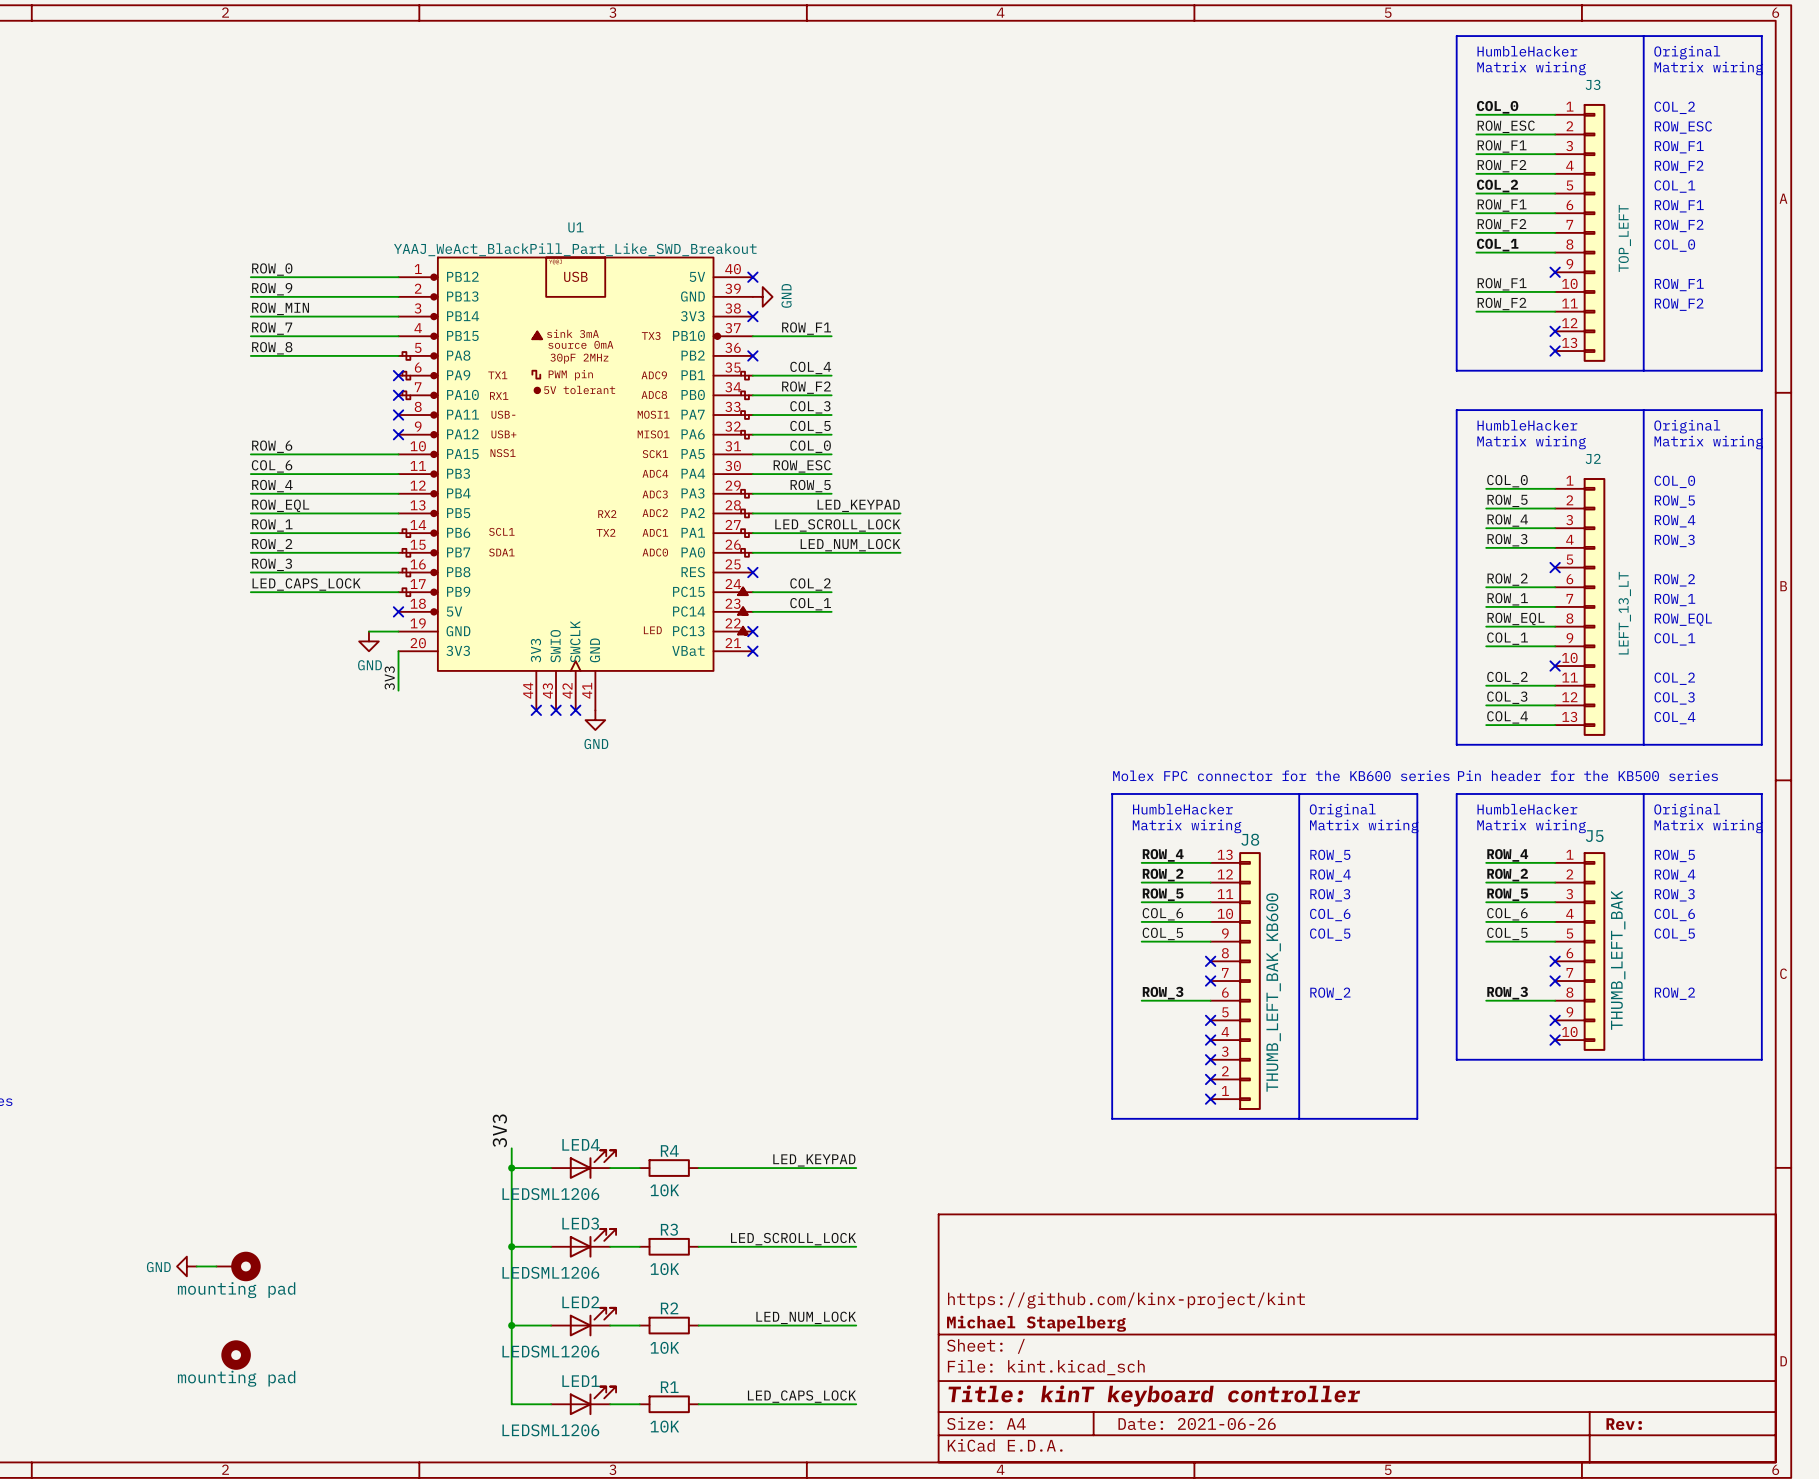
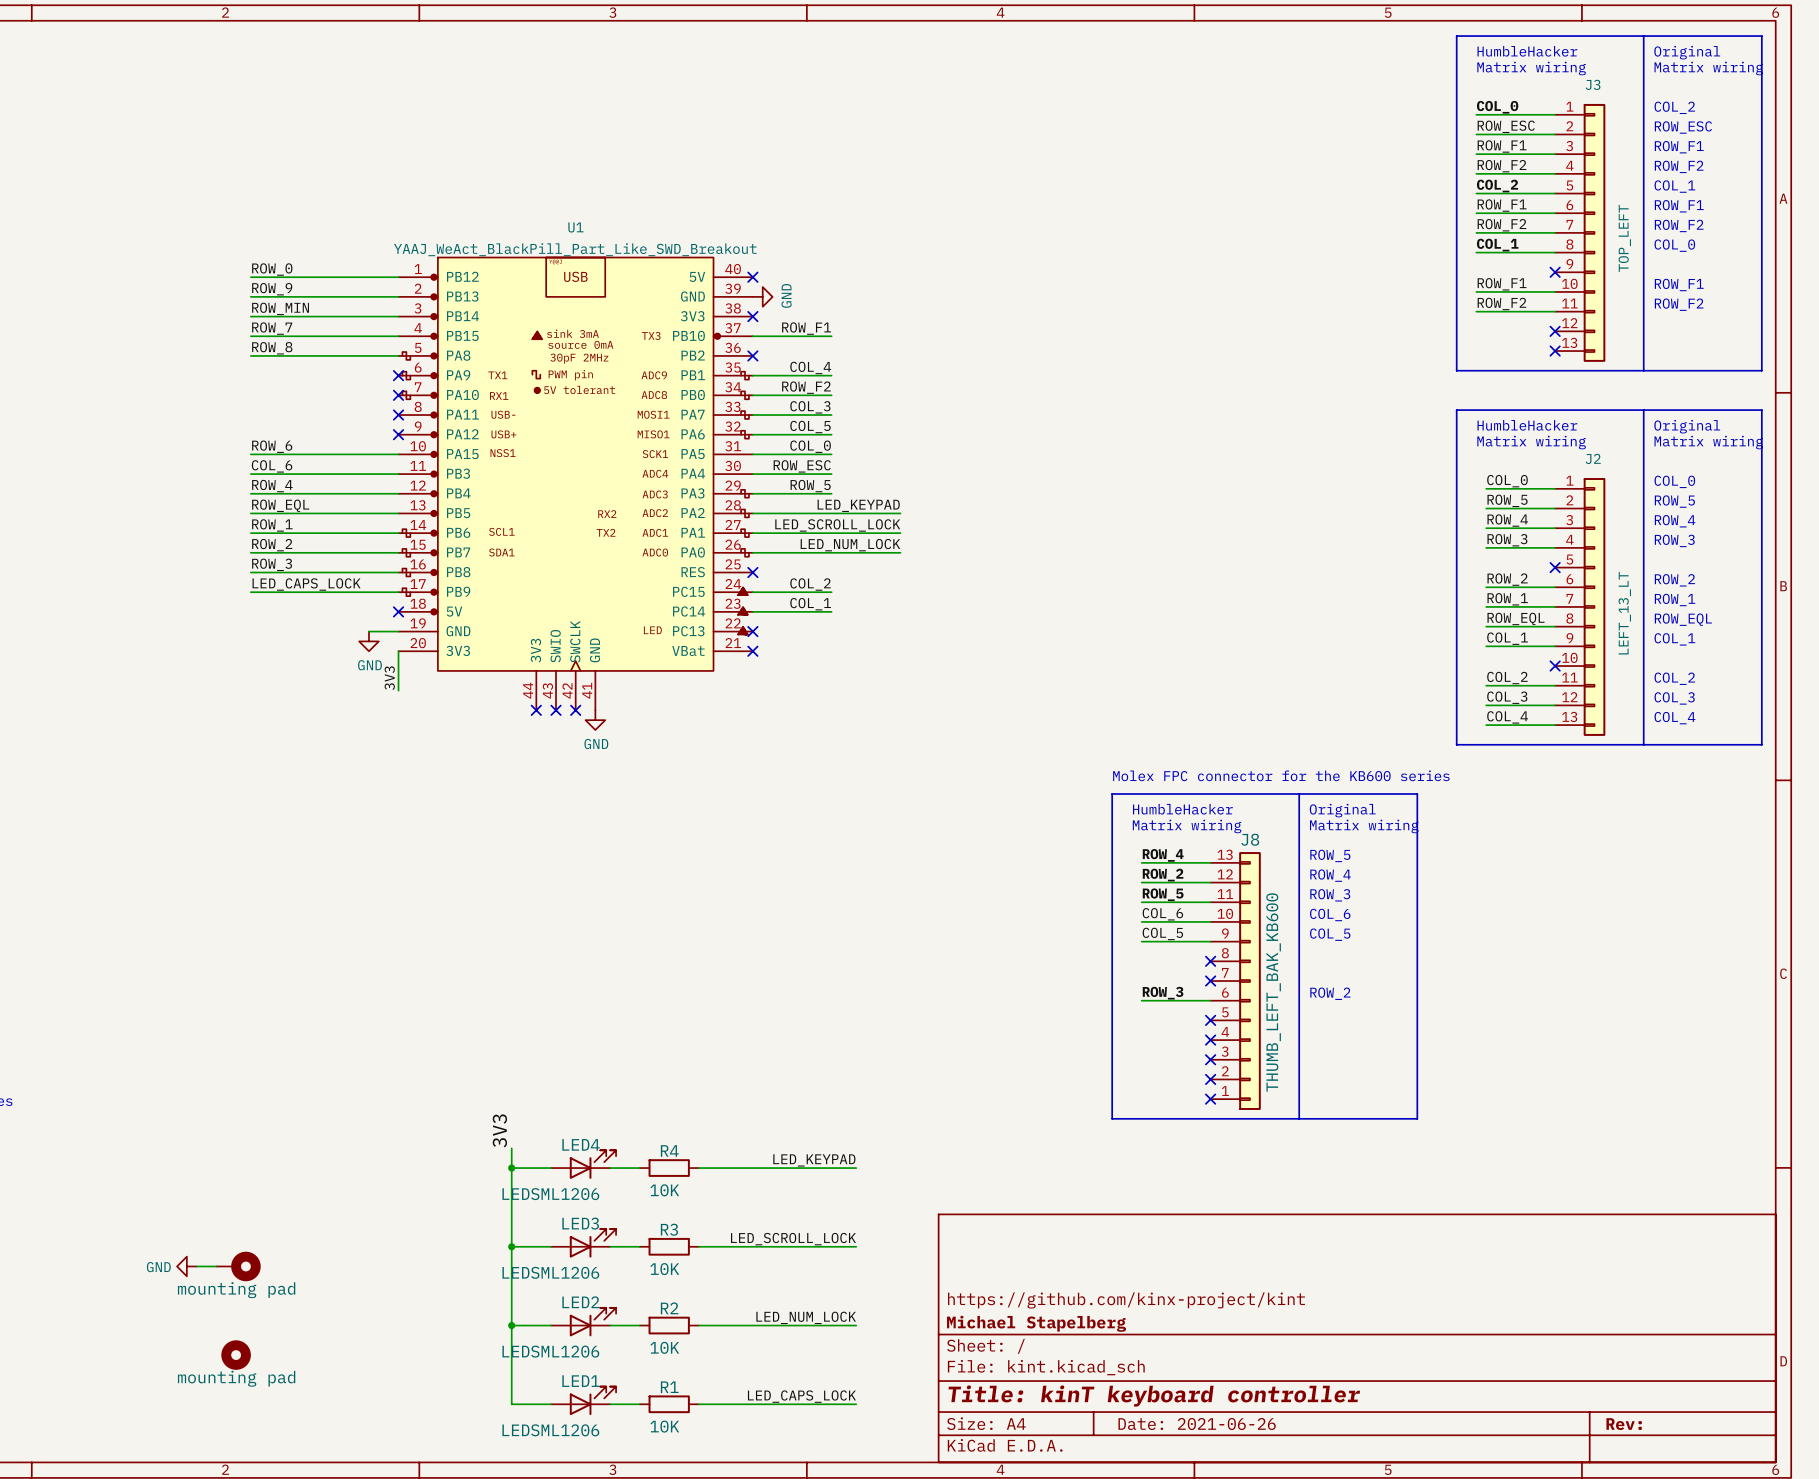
text: Pin header for the KB500 series (1587, 775) -> none
line: (1456, 793) (1761, 793) (1761, 1059) (1456, 1059) (1456, 793) -> none
line: (1643, 793) (1643, 1059) -> none
text: HumbleHacker (1527, 809) -> none
text: Original (1687, 810) -> none
text: Matrix wiring (1531, 826) -> none
text: Matrix wiring (1708, 826) -> none
label: ROW_4 (1507, 855) -> none
text: ROW_5 (1674, 855) -> none
wire: (1486, 862) (1555, 862) -> none
label: ROW_2 (1507, 875) -> none
text: ROW_4 (1675, 875) -> none
wire: (1486, 882) (1555, 882) -> none
label: ROW_5 (1507, 894) -> none
text: ROW_3 (1674, 895) -> none
wire: (1486, 902) (1555, 902) -> none
label: COL_6 (1507, 914) -> none
text: COL_6 (1674, 915) -> none
wire: (1486, 921) (1555, 921) -> none
label: COL_5 (1507, 933) -> none
text: COL_5 (1674, 934) -> none
wire: (1486, 941) (1555, 941) -> none
J5: THUMB_LEFT_BAK (1580, 951) -> none
no-connect mark: (1555, 961) -> none
no-connect mark: (1555, 981) -> none
label: ROW_3 (1507, 993) -> none
text: ROW_2 (1674, 993) -> none
wire: (1486, 1000) (1555, 1000) -> none
no-connect mark: (1555, 1020) -> none
no-connect mark: (1555, 1040) -> none

